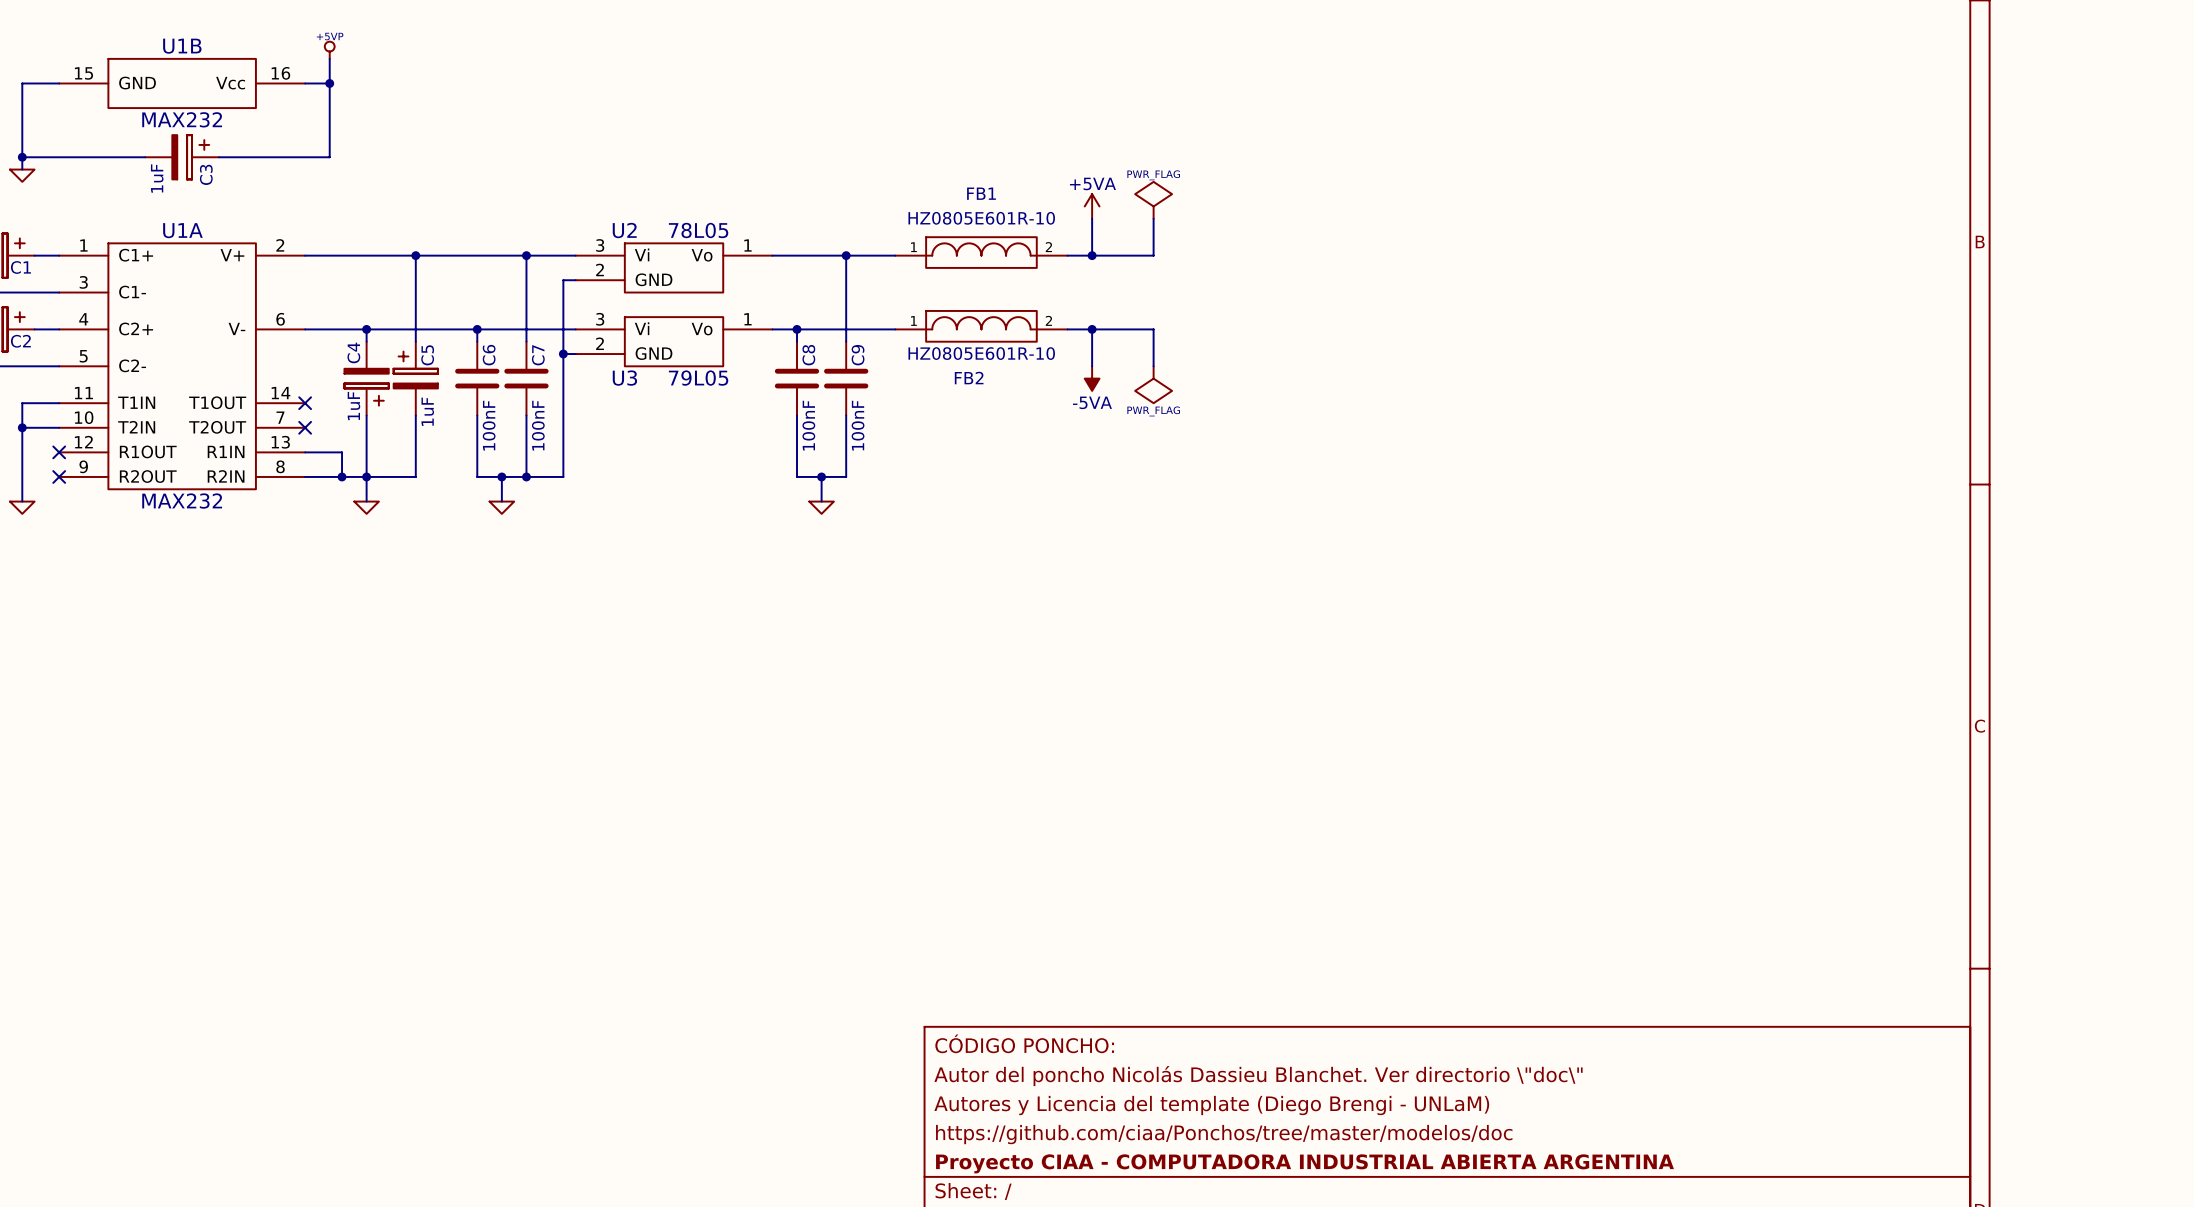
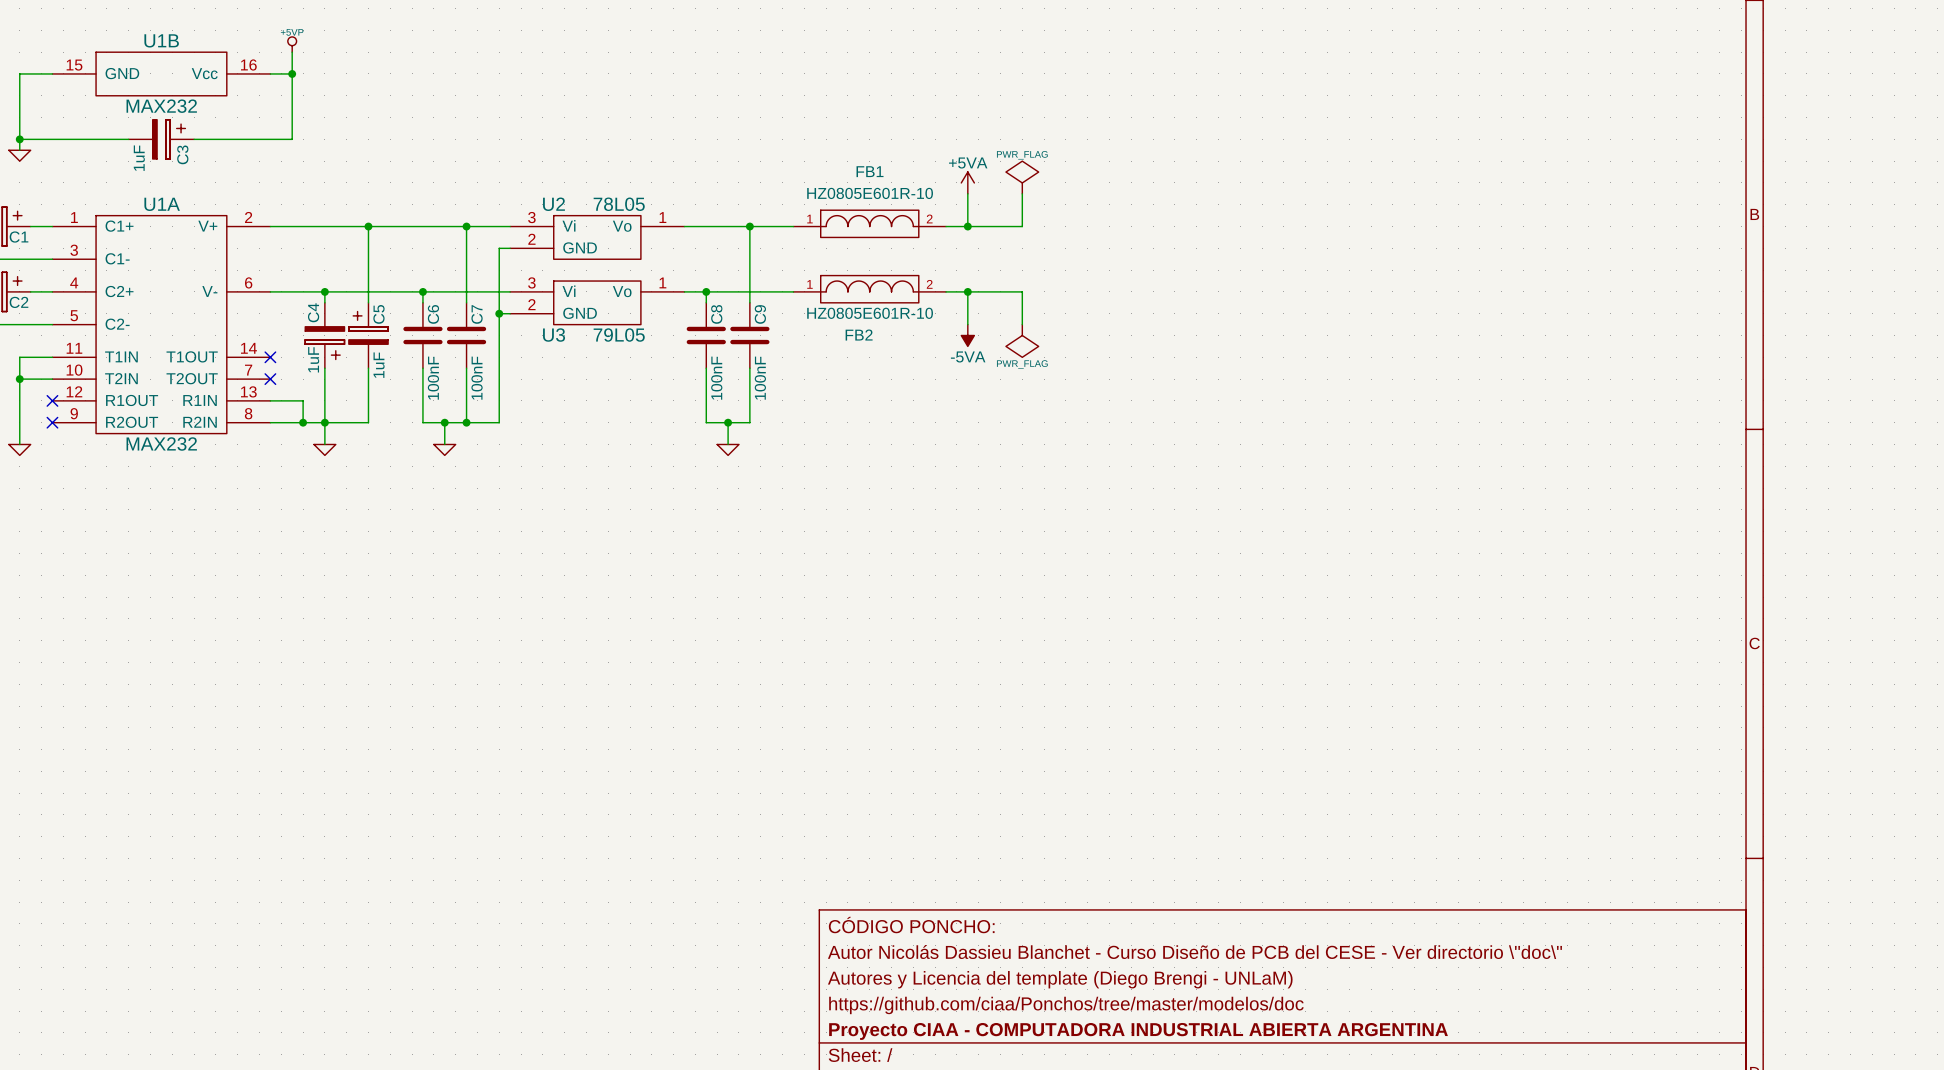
title block: Autor del poncho Nicolás Dassieu Blanchet. Ver directorio \"doc\" (1258, 1076) -> Autor Nicolás Dassieu Blanchet - Curso Diseño de PCB del CESE - Ver directorio \"doc\" (1194, 952)

